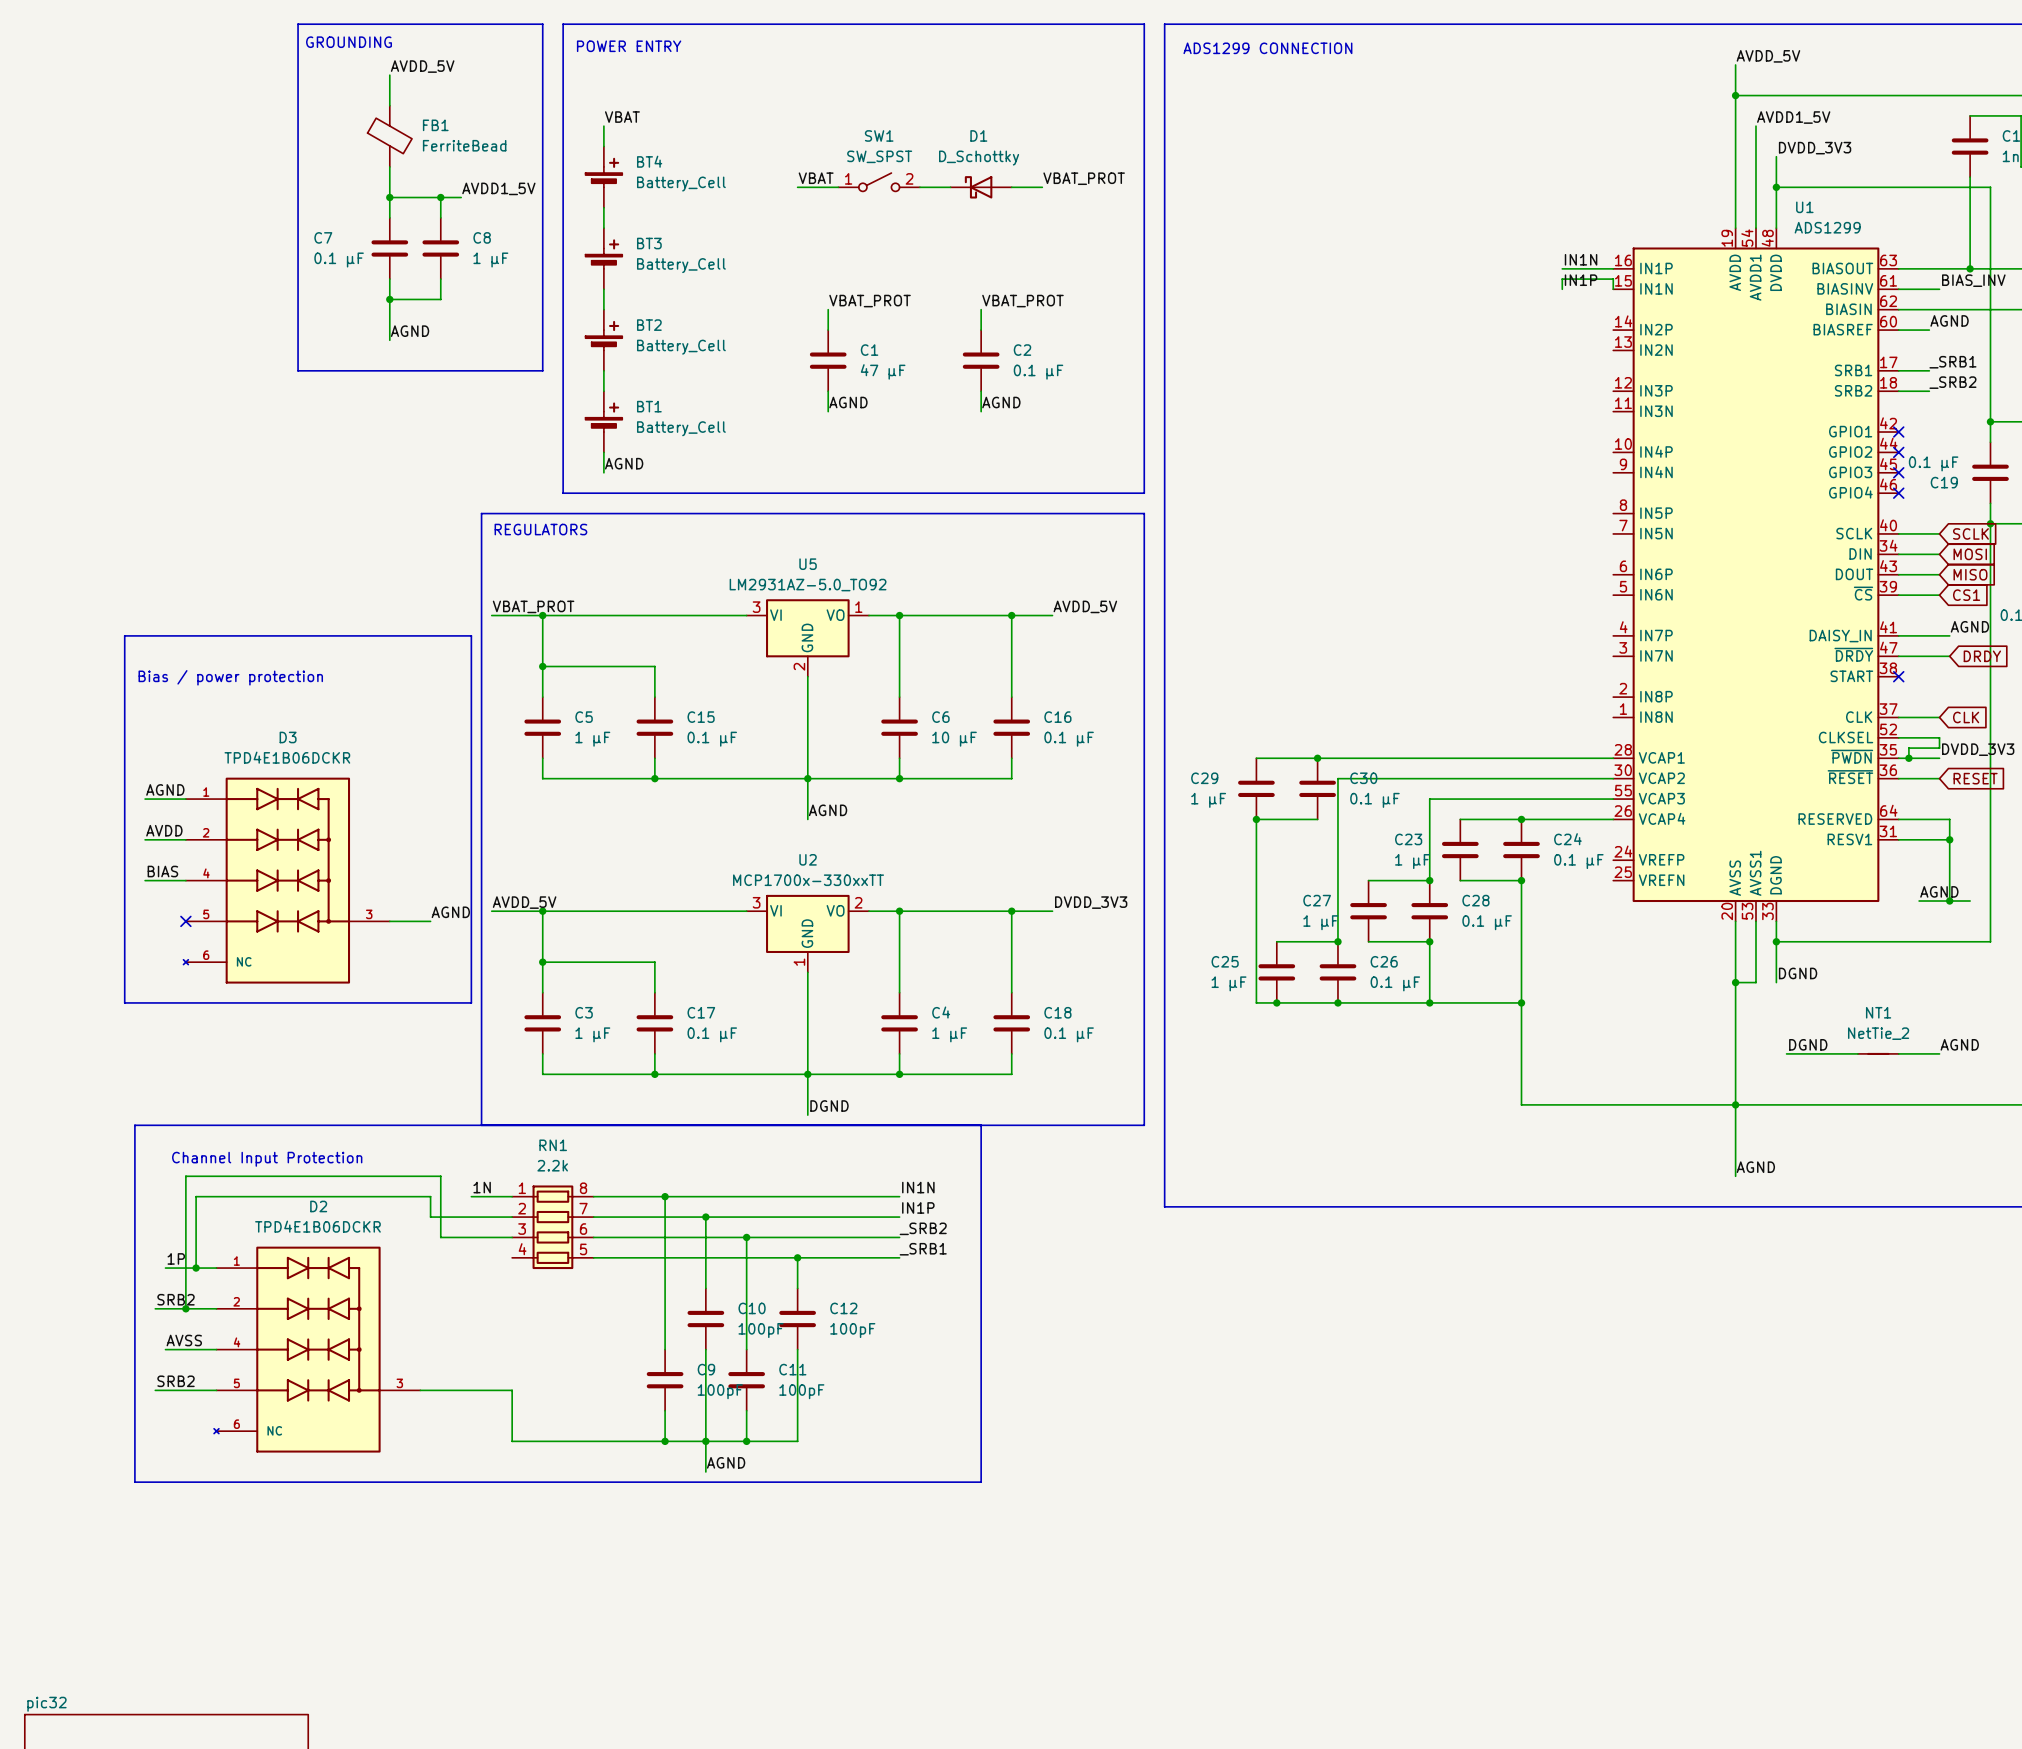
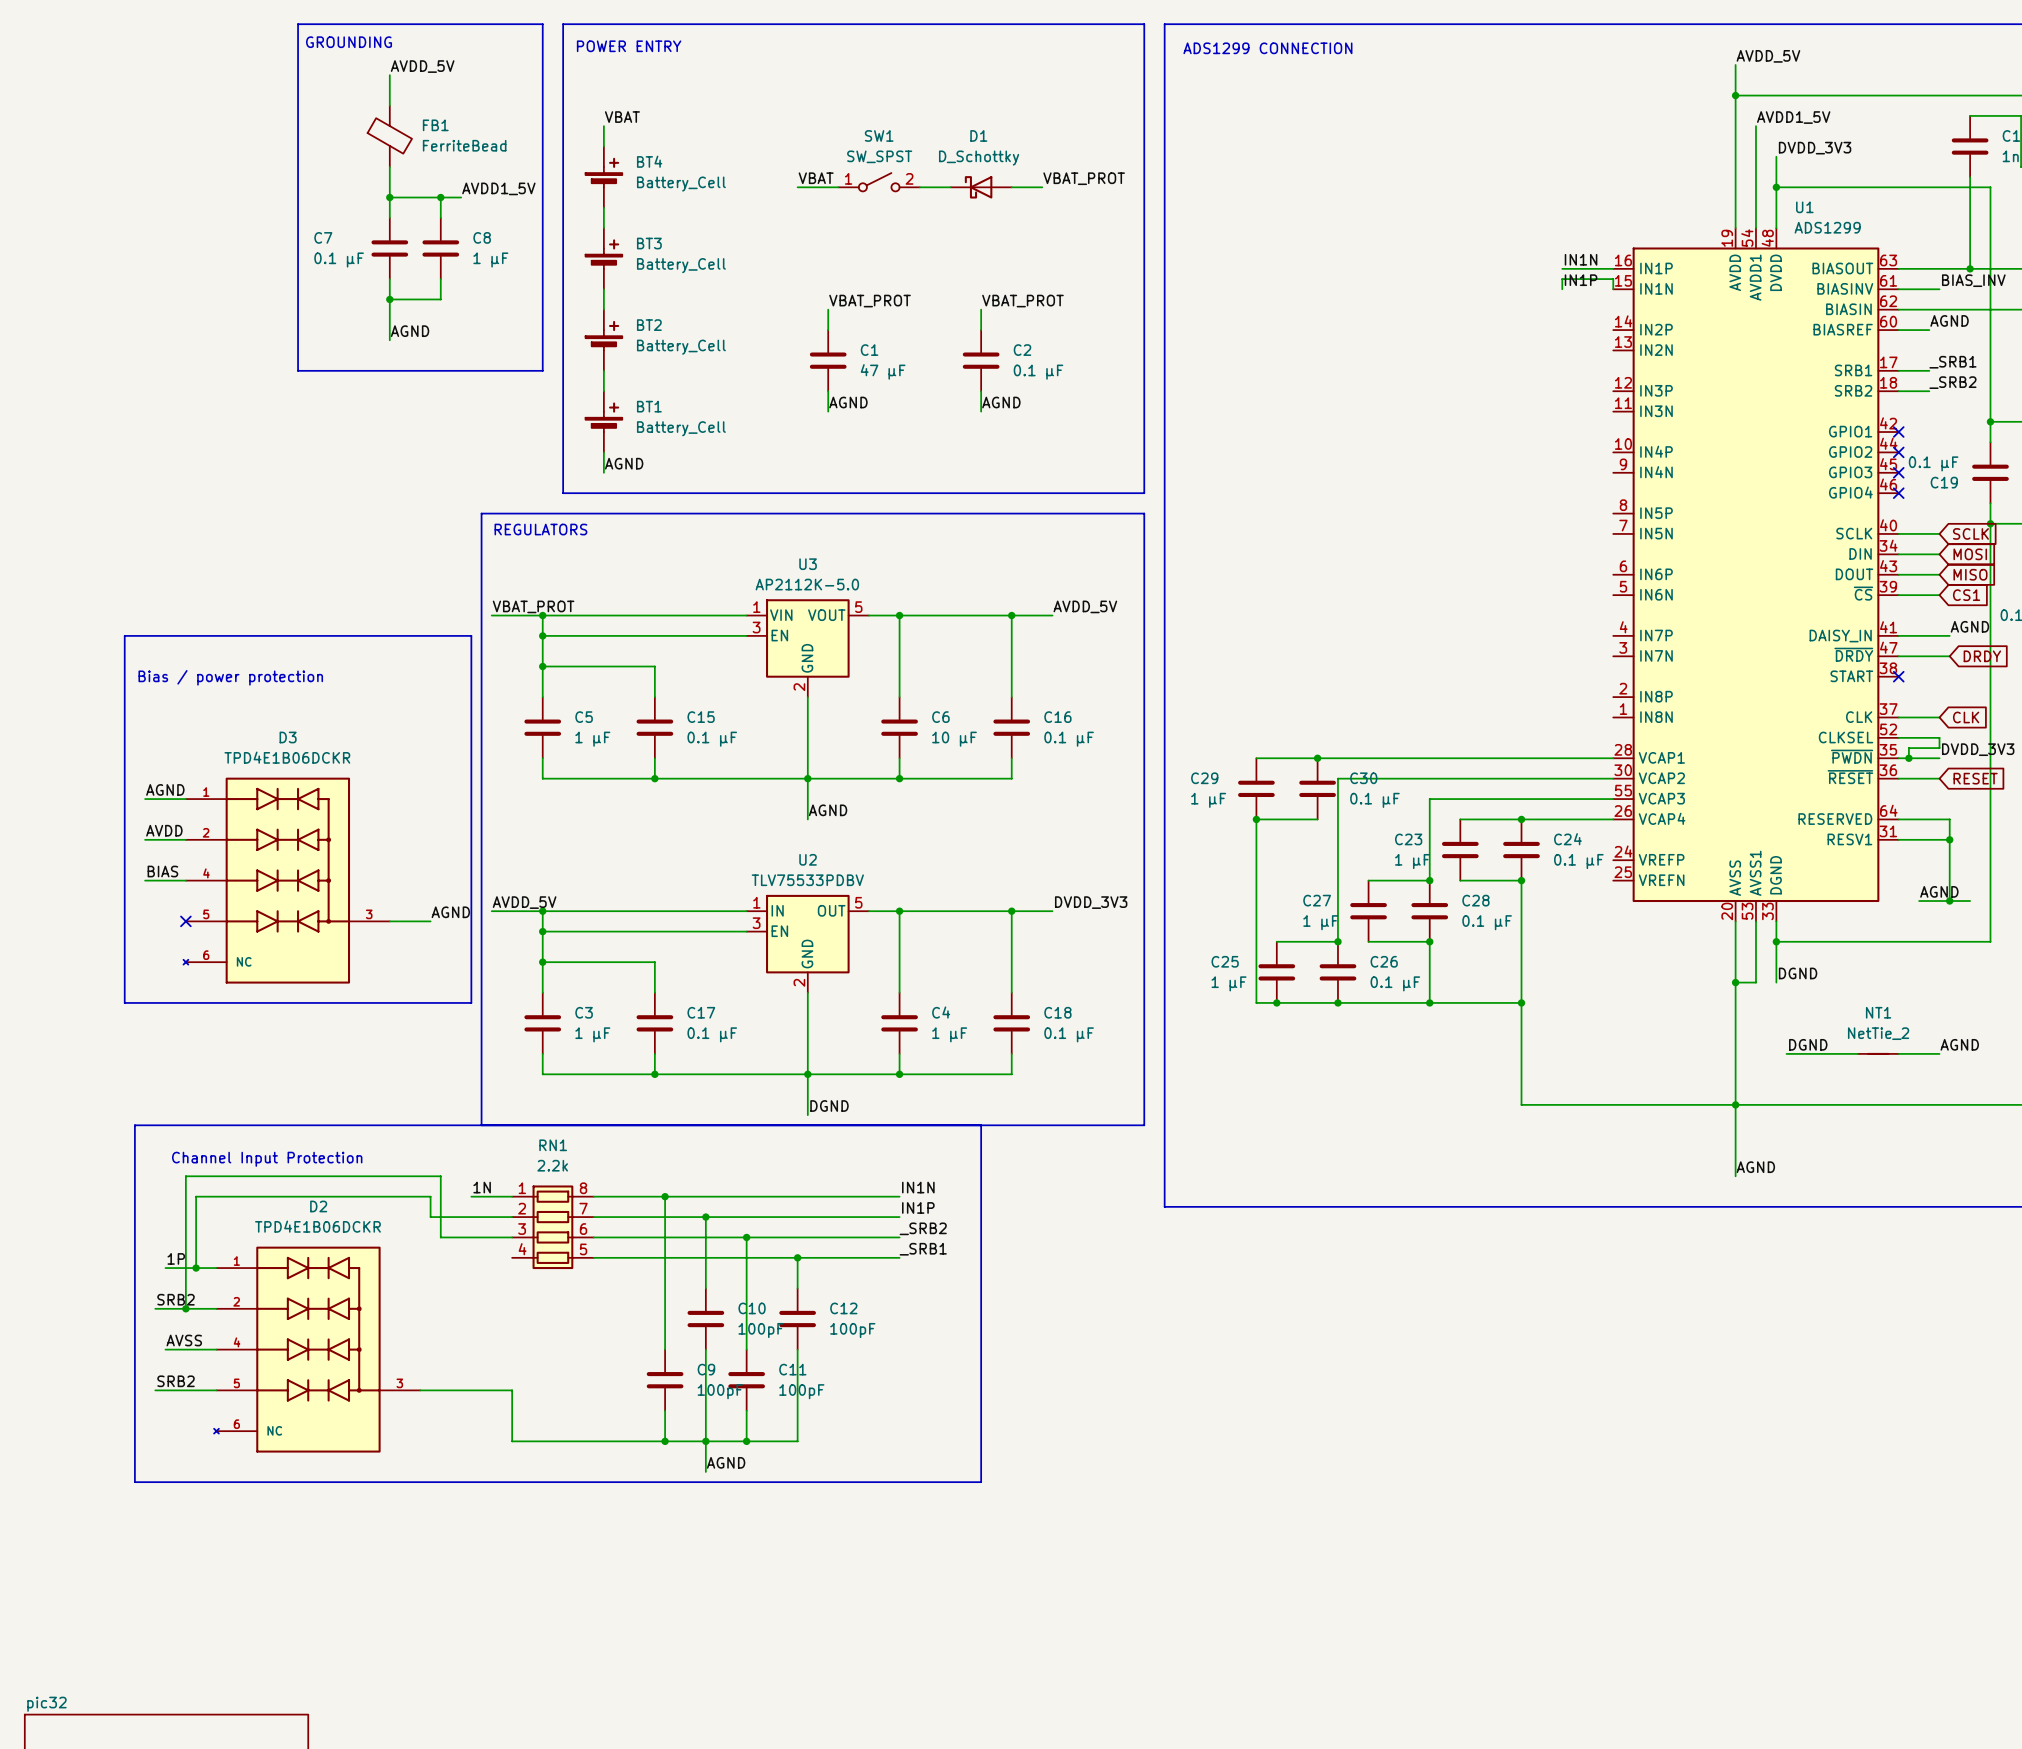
wire: none -> (542, 635) (746, 635)
junction: none -> (542, 635)
U5: LM2931AZ-5.0_TO92 (807, 637) -> none
U3: none -> AP2112K-5.0 (807, 648)
U2 value: MCP1700x-330xxTT (808, 880) -> TLV75533PDBV (807, 880)
U2 symbol: [746, 894, 869, 973] -> [746, 894, 869, 993]
wire: none -> (542, 931) (746, 931)
junction: none -> (542, 931)

